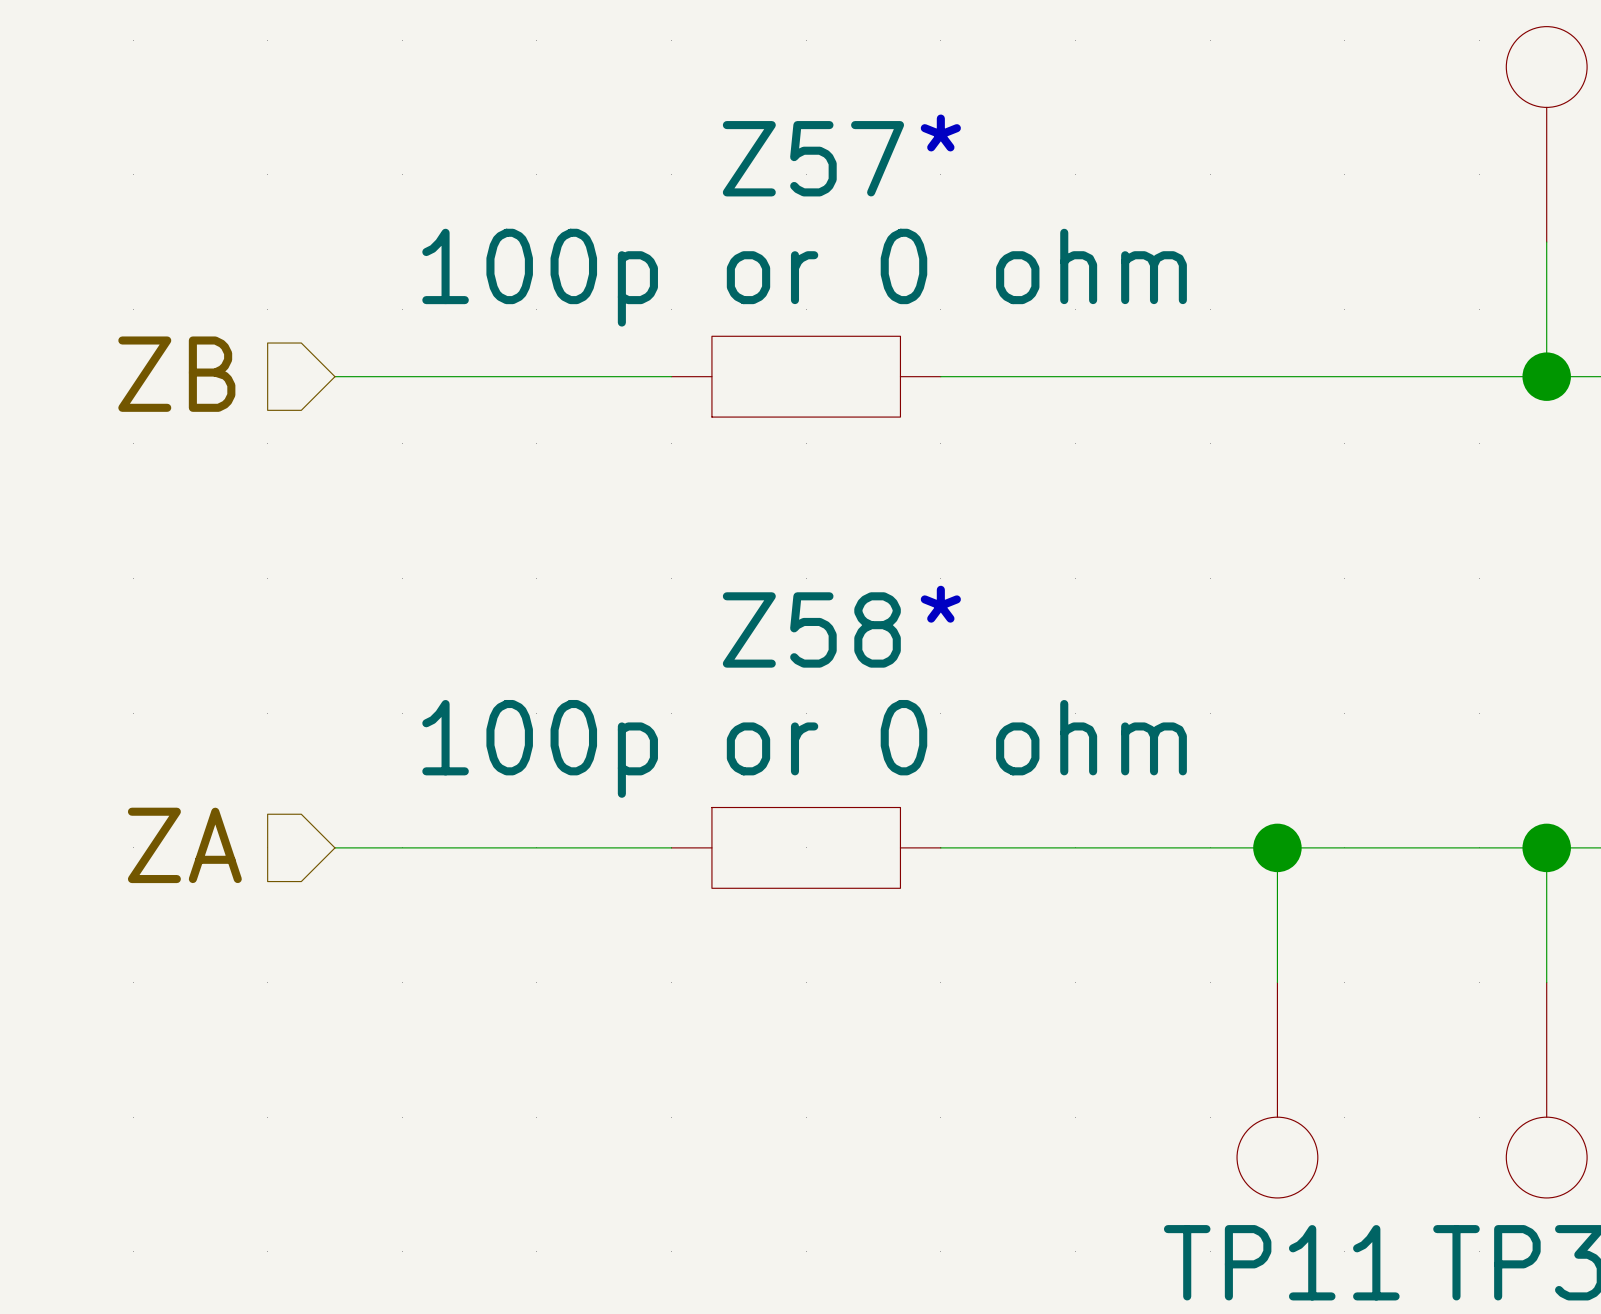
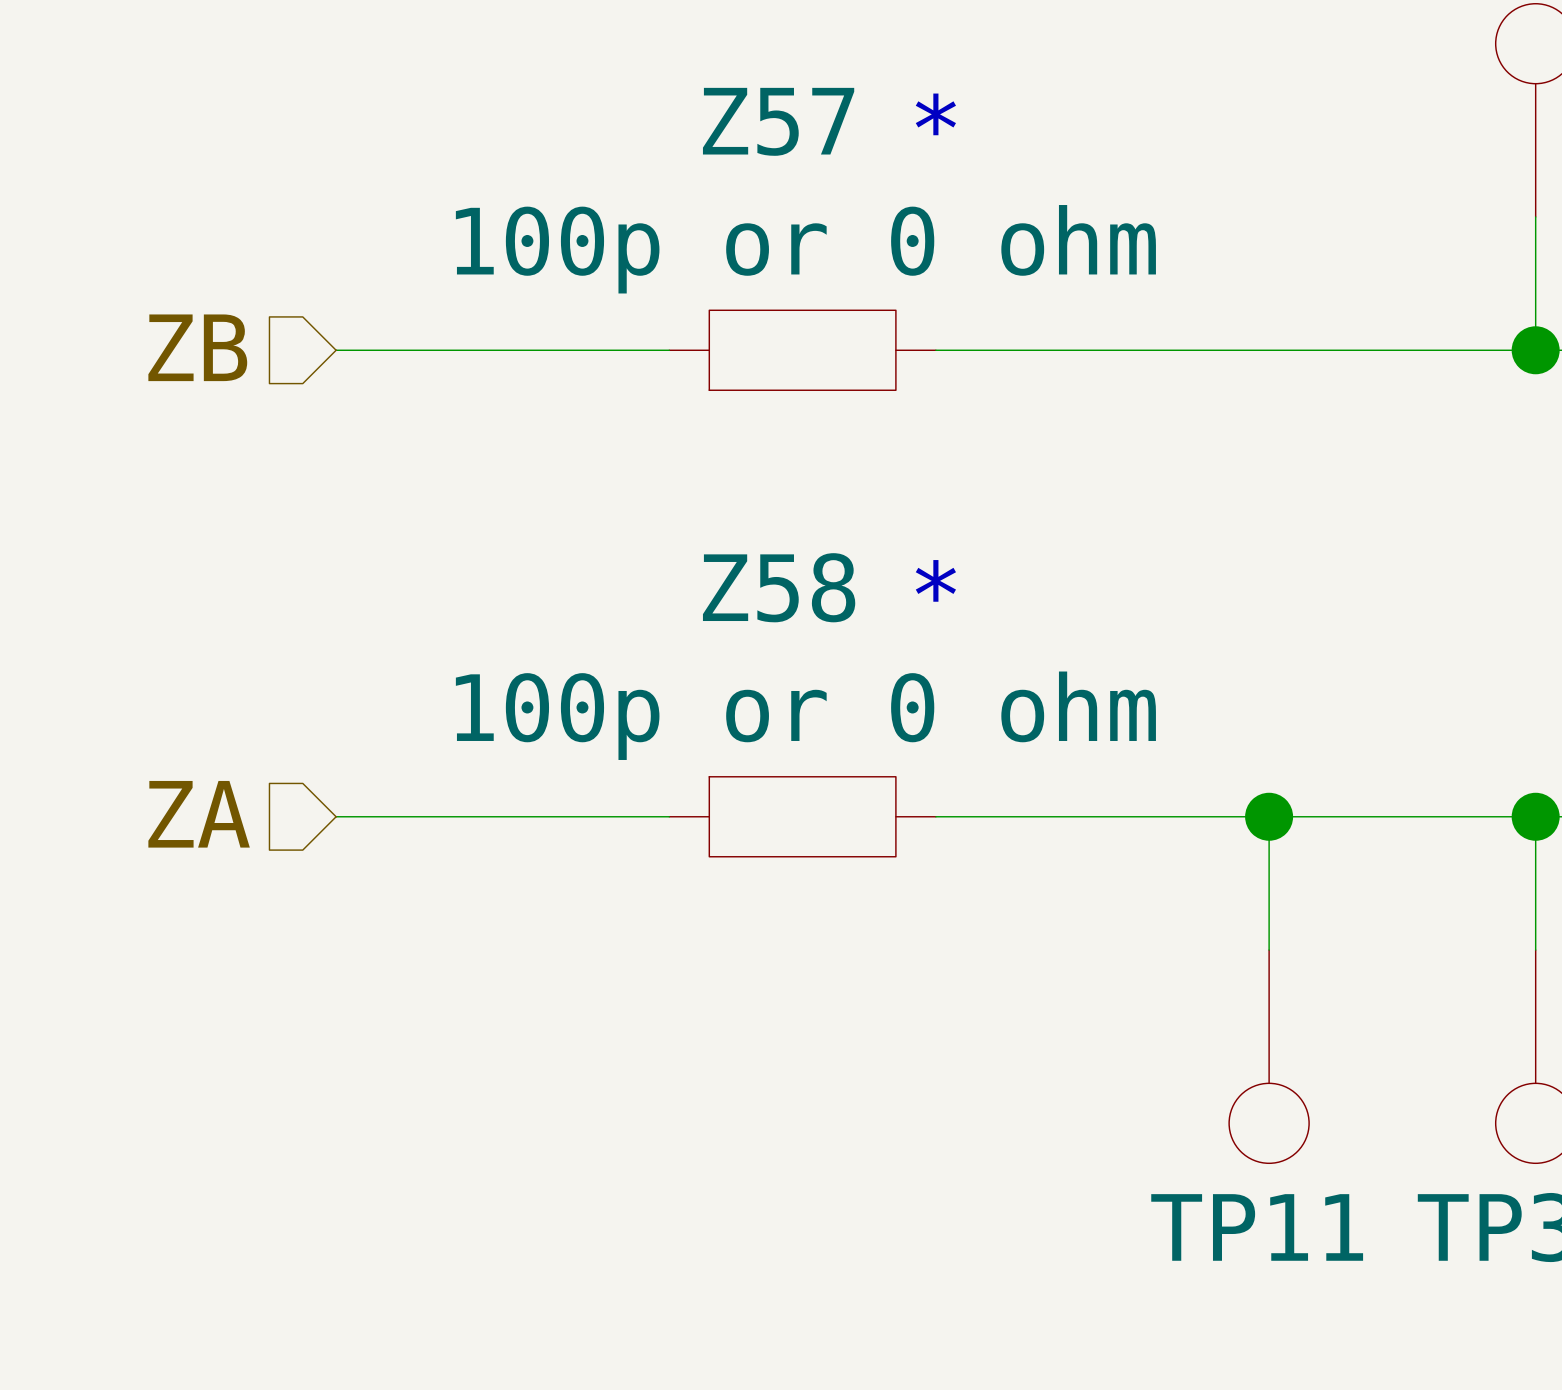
Z57 name position: Z57 (813, 158) -> Z57 (778, 121)
Z58 name position: Z58 (811, 629) -> Z58 (779, 587)

